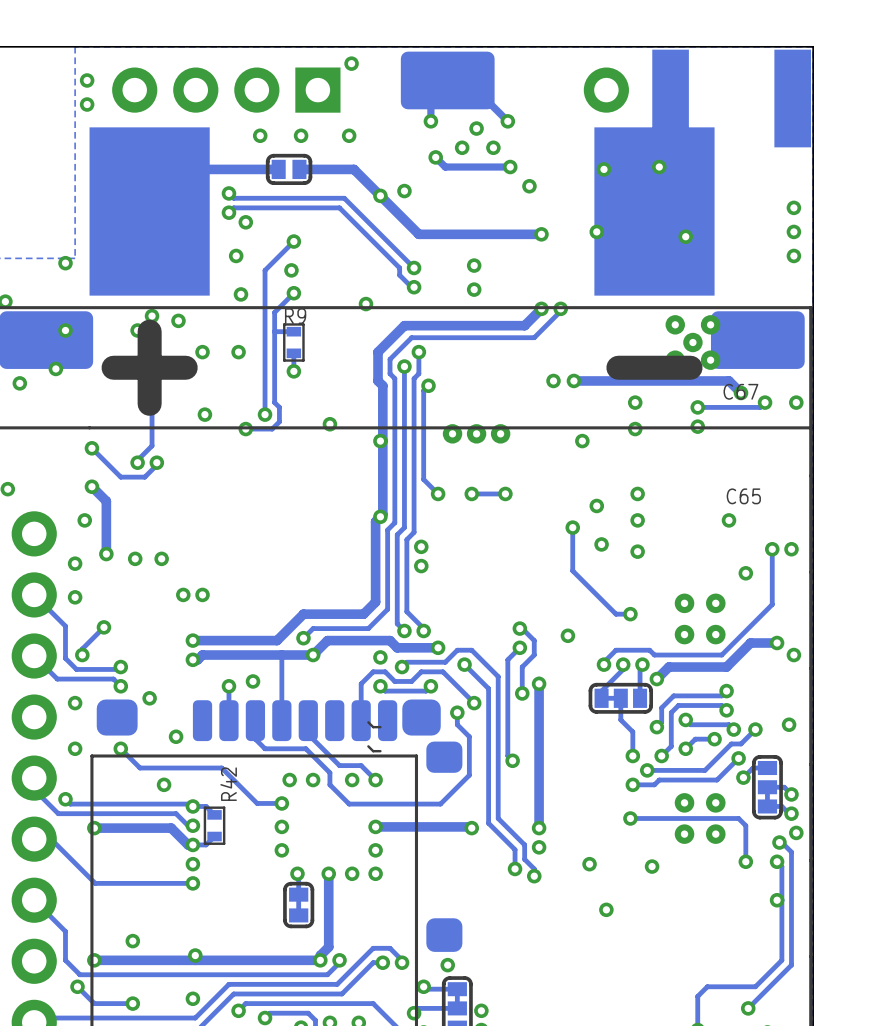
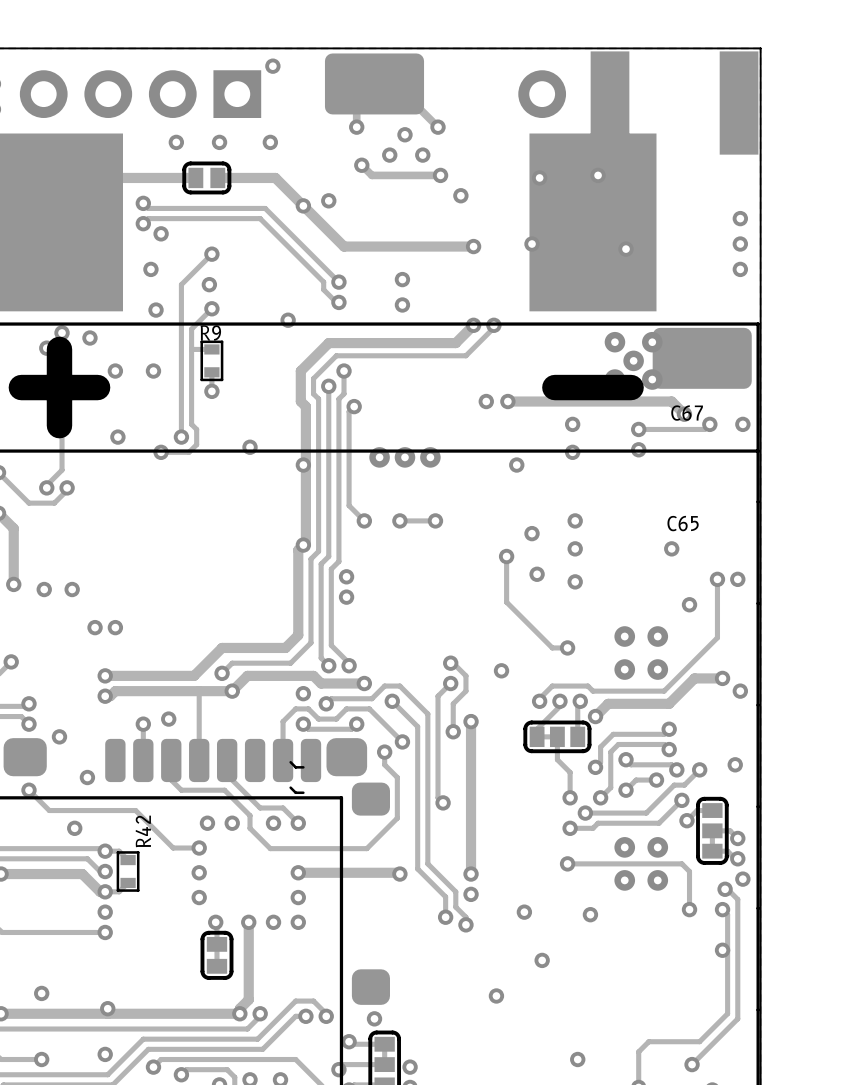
via: none -> (496, 995)
via: none -> (577, 1059)

